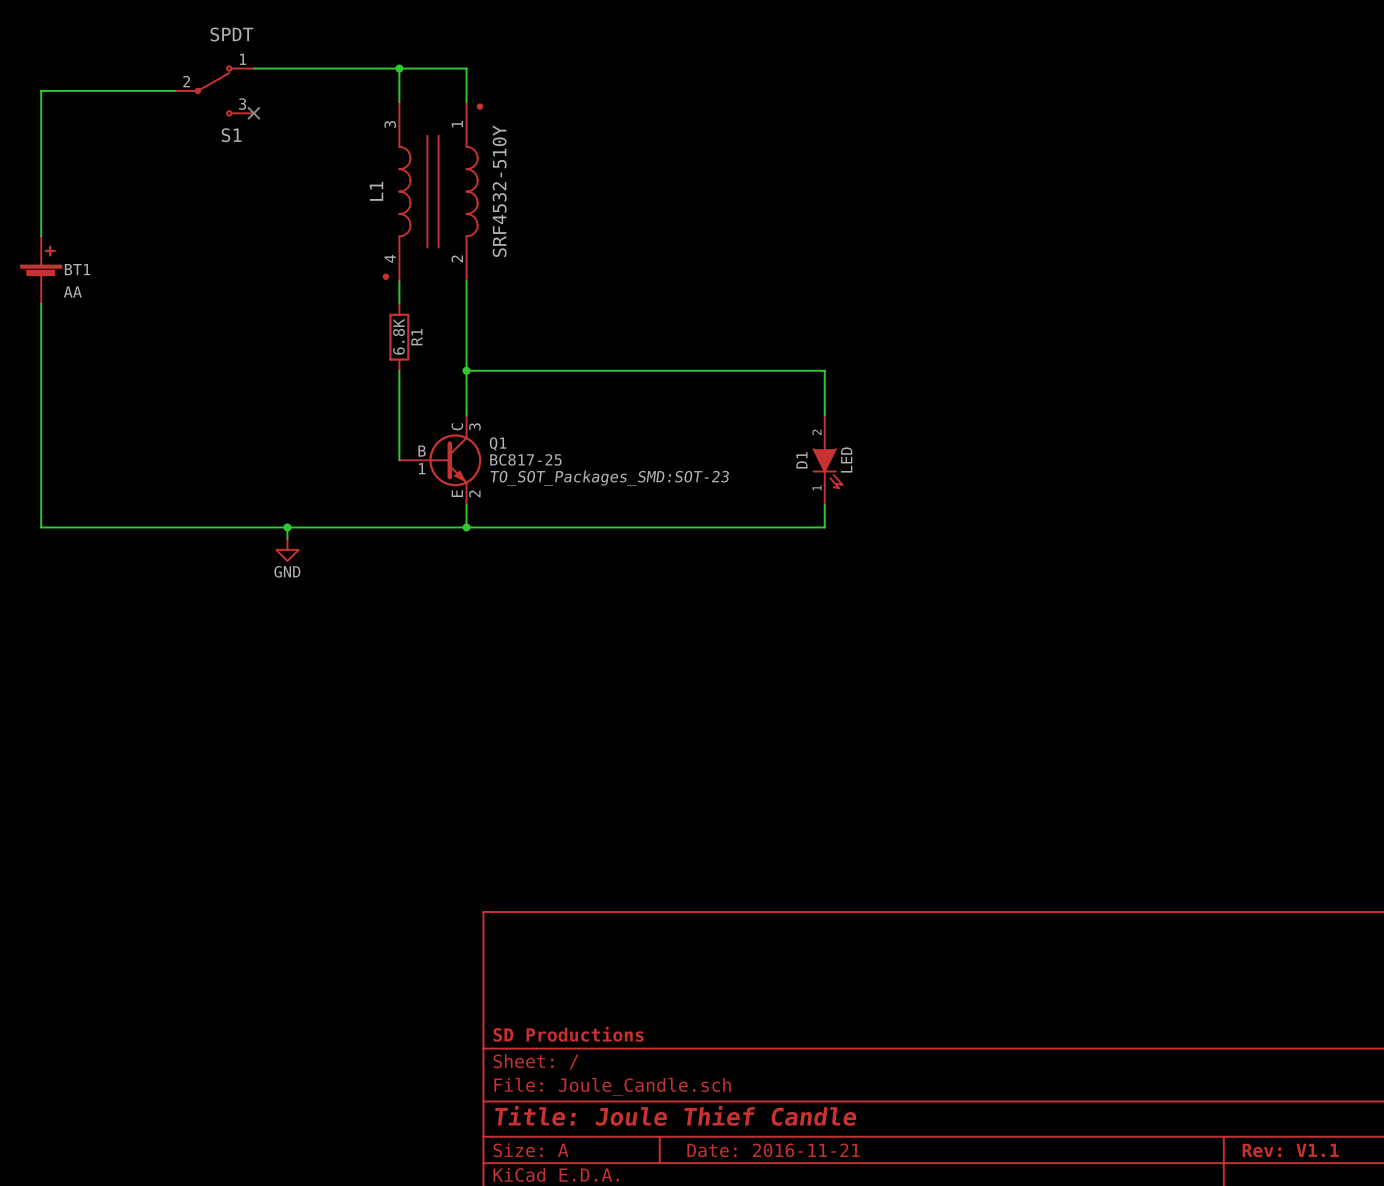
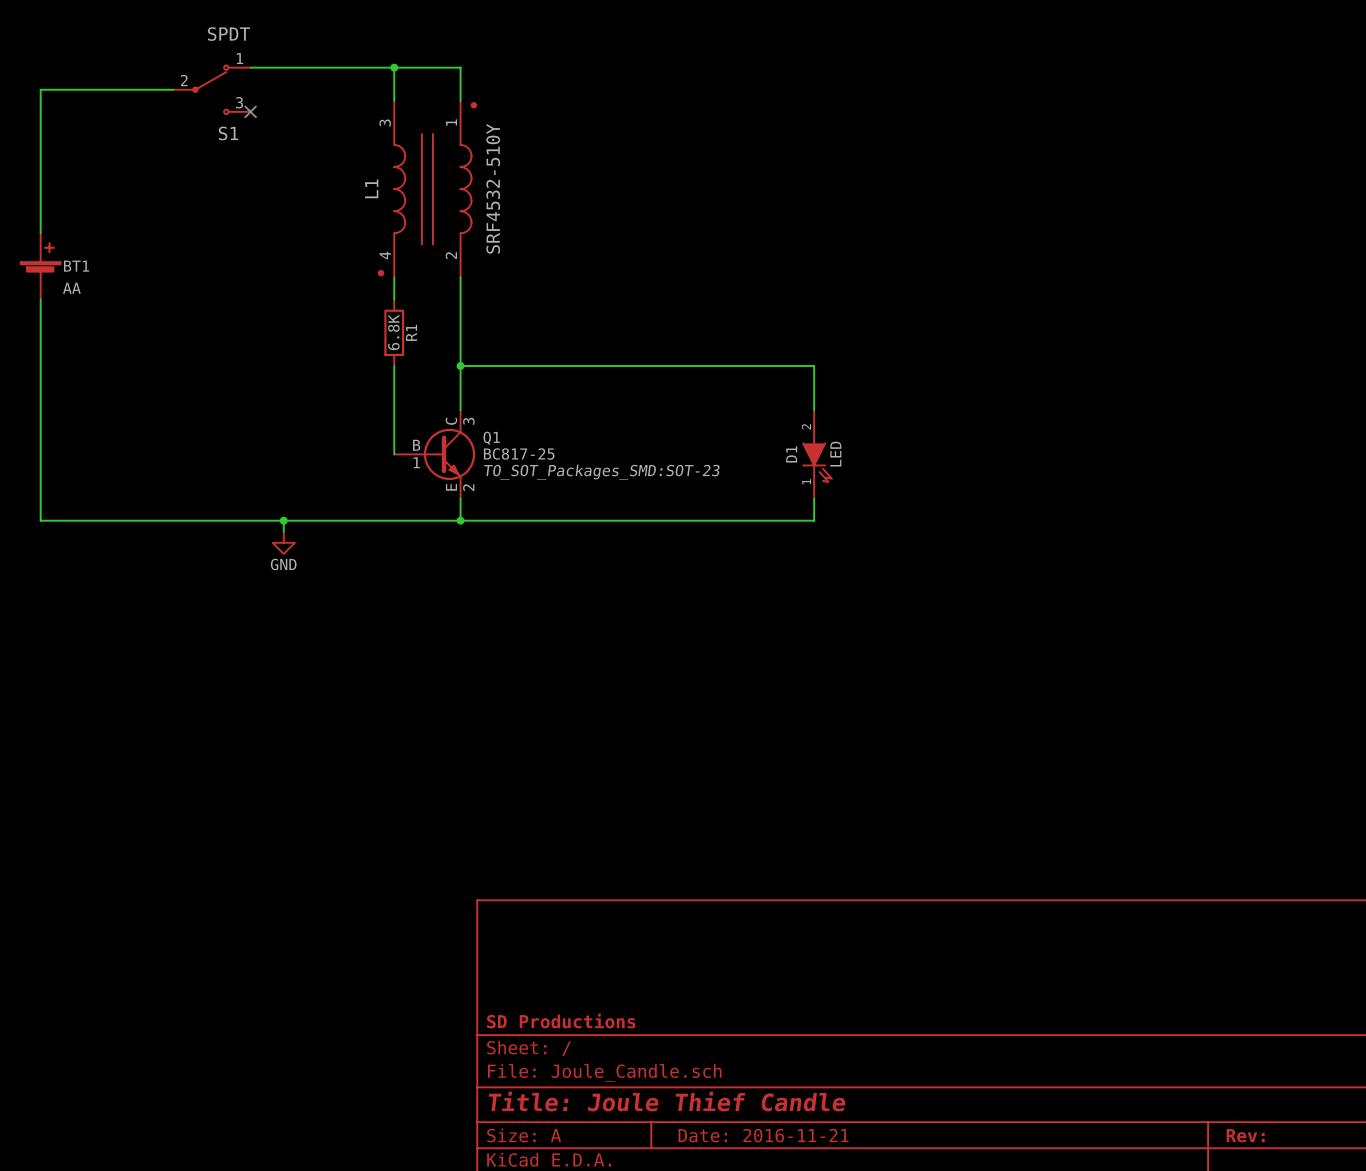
title block: Rev: V1.1 (1290, 1150) -> Rev: (1245, 1135)

